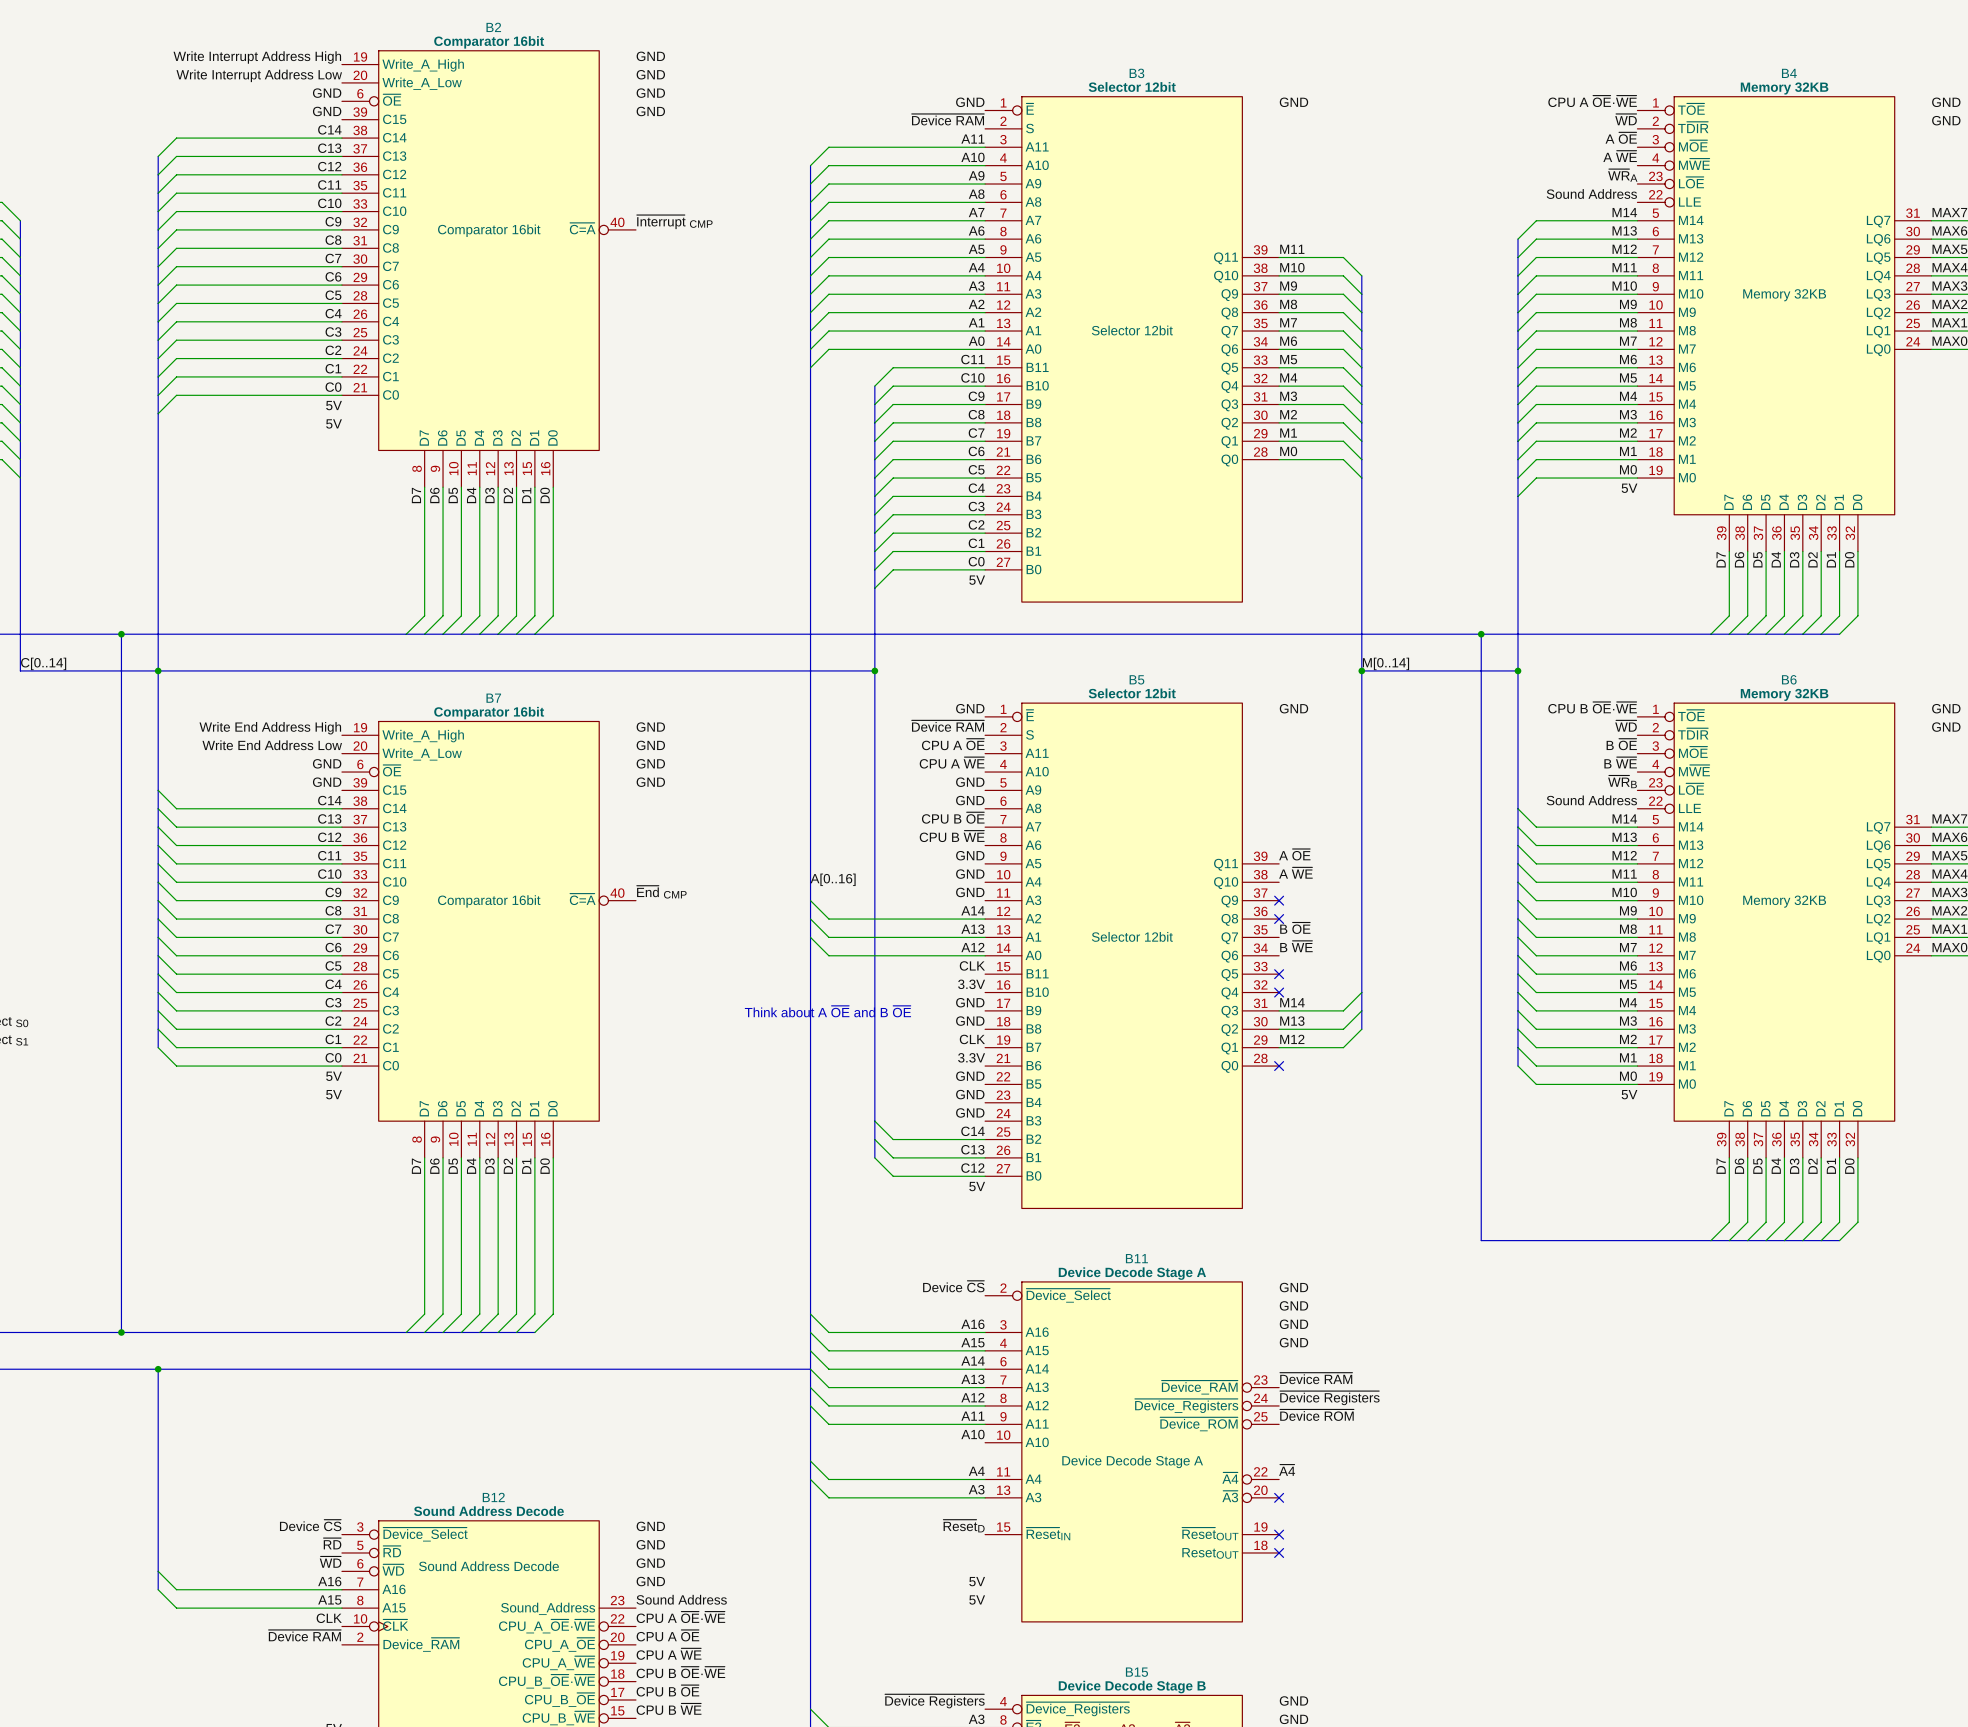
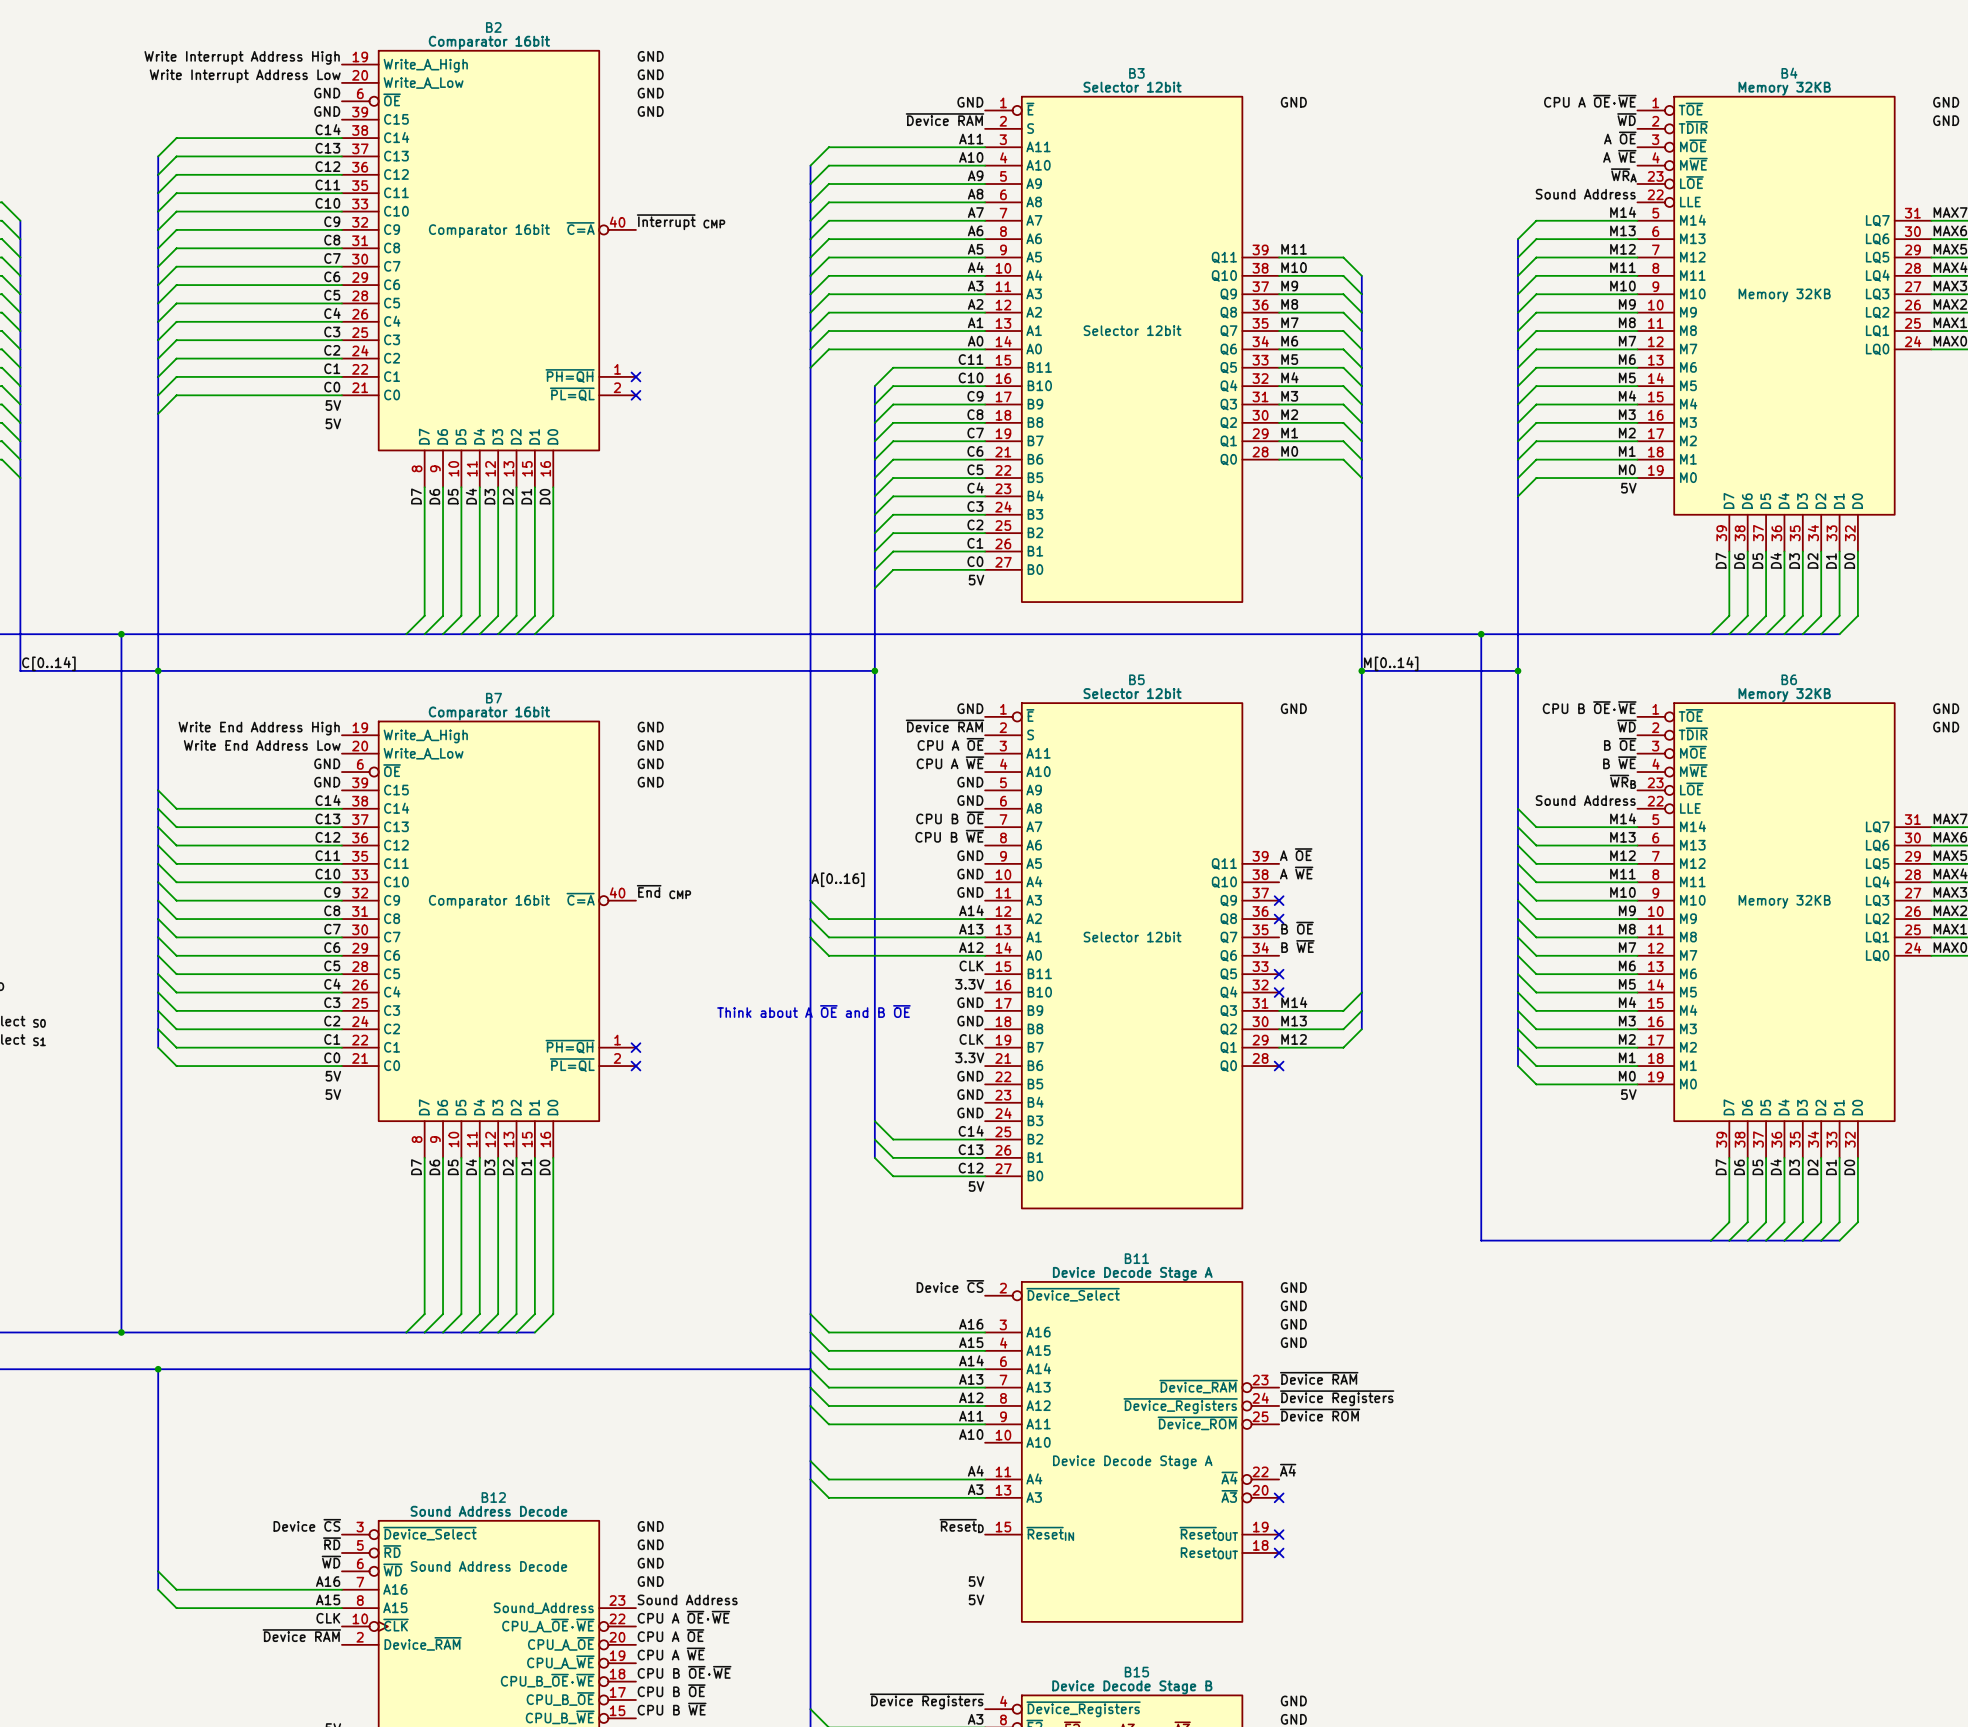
B2 symbol: [341, 50, 636, 488] -> [341, 50, 636, 488]
no-connect mark: none -> (635, 376)
no-connect mark: none -> (635, 395)
B7 symbol: [341, 720, 636, 1158] -> [341, 720, 636, 1158]
no-connect mark: none -> (635, 1047)
no-connect mark: none -> (635, 1066)

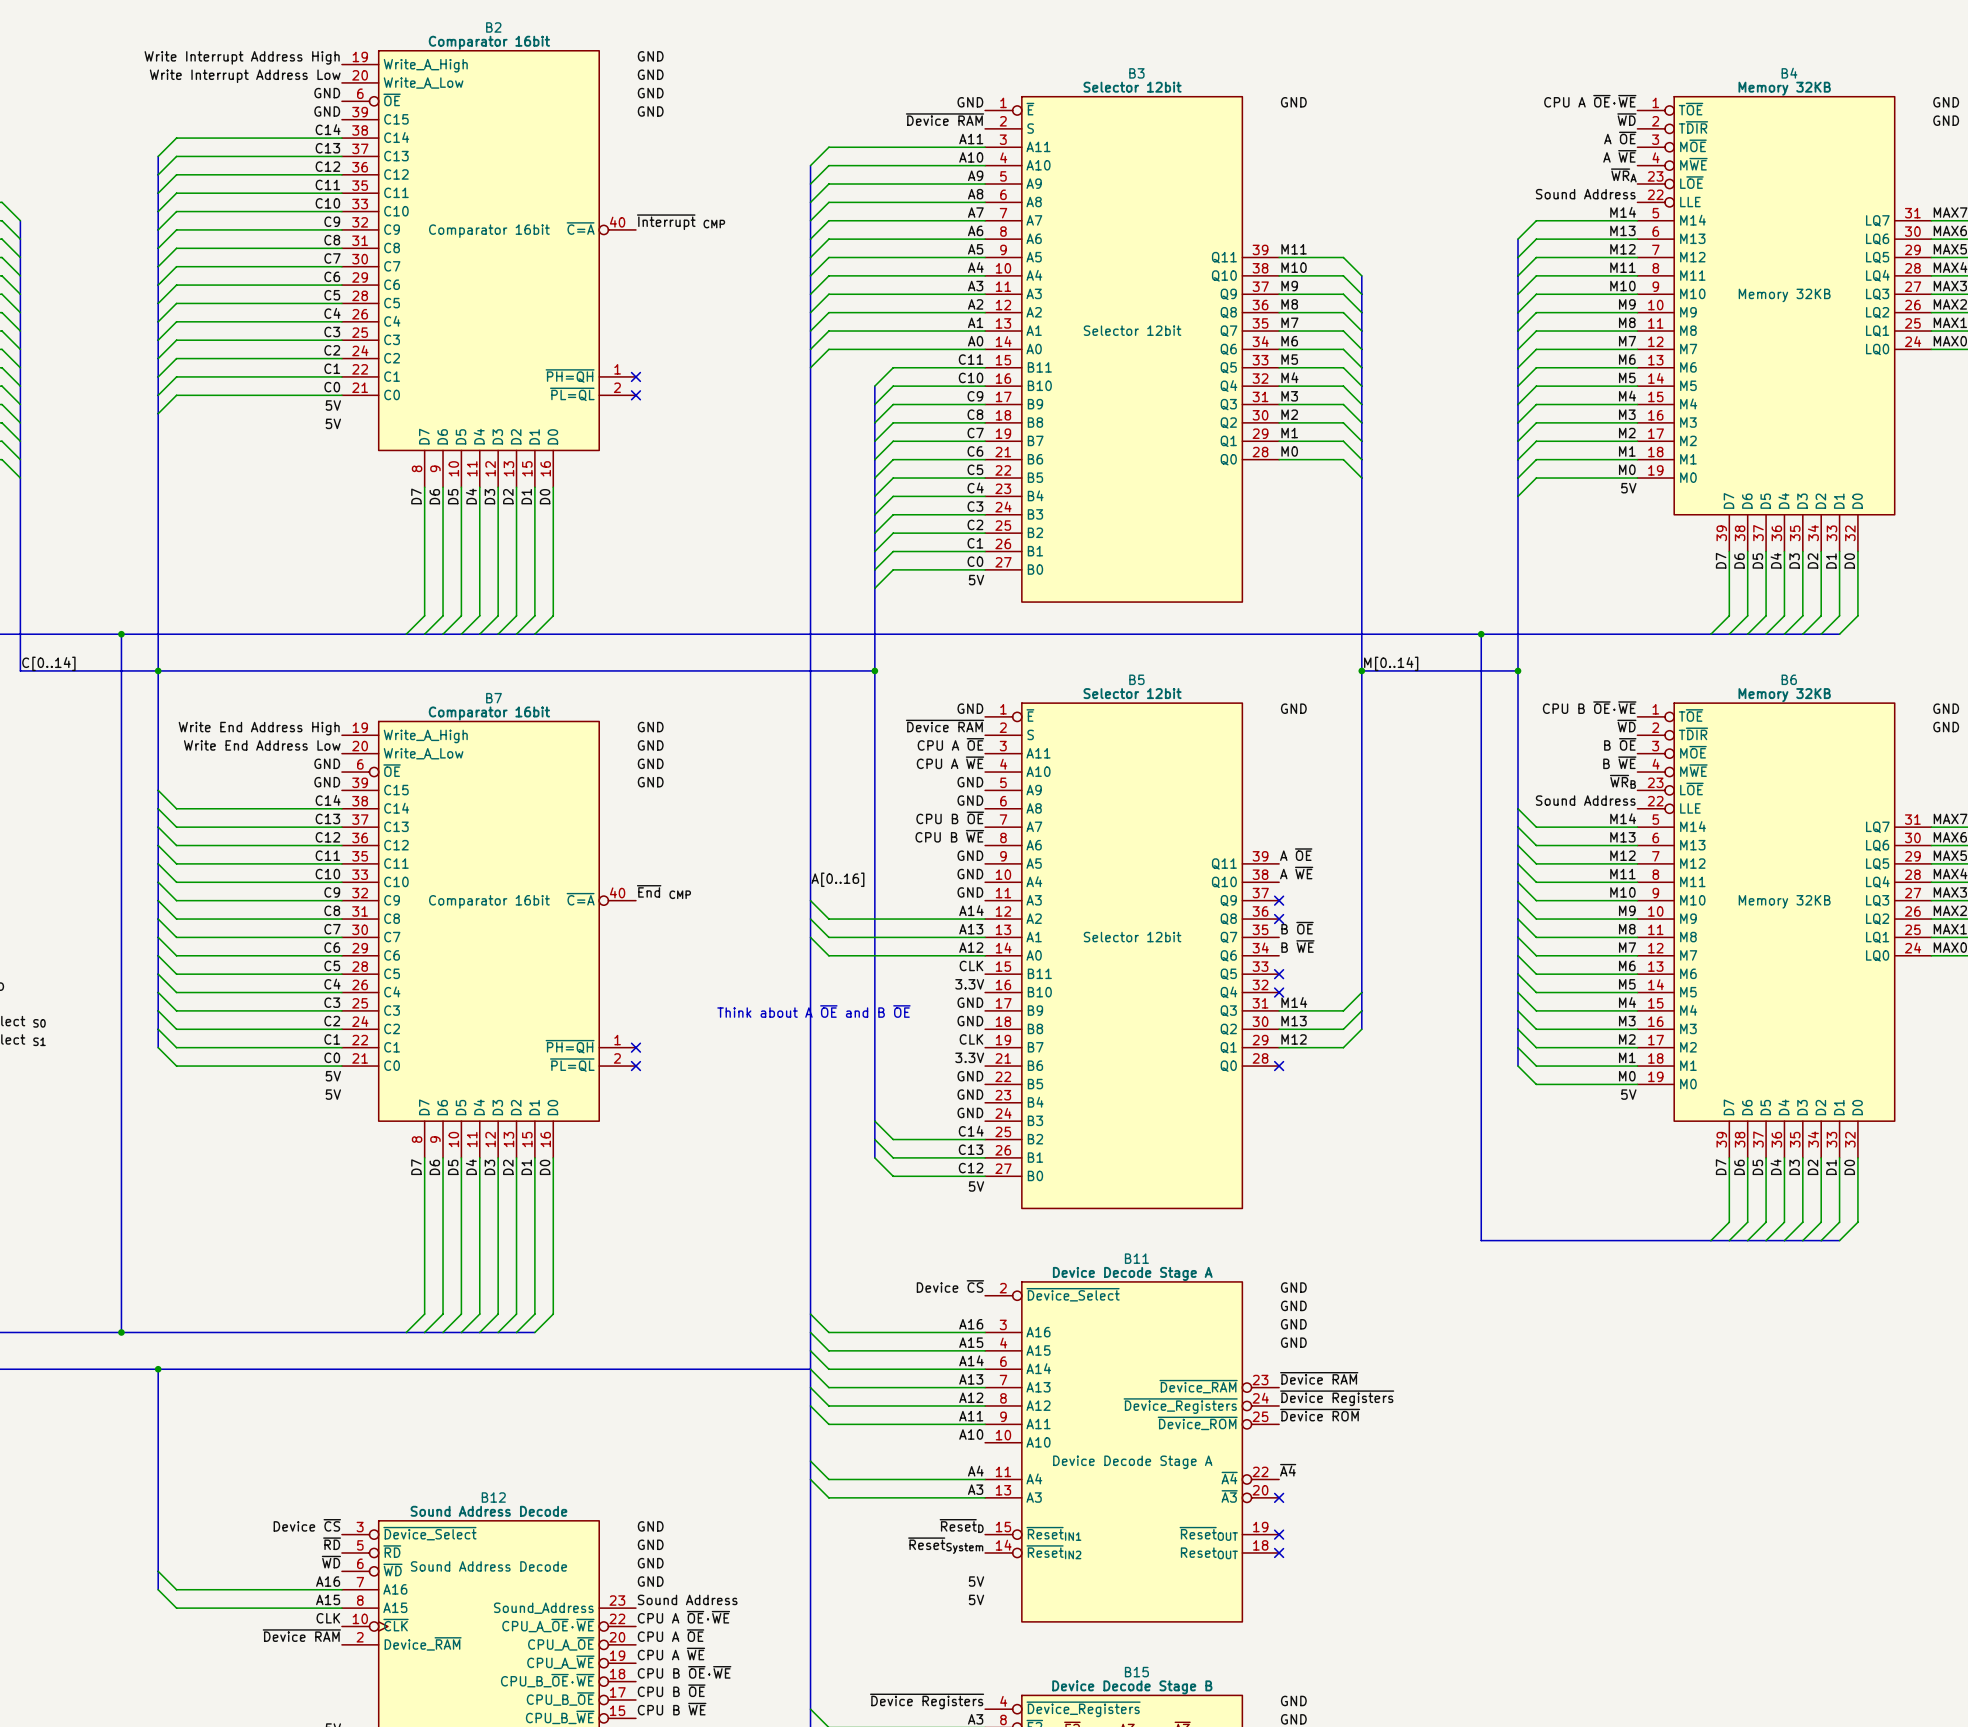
B11 symbol: [985, 1281, 1280, 1623] -> [985, 1281, 1280, 1623]
label: none -> ~{Reset}System (945, 1545)

